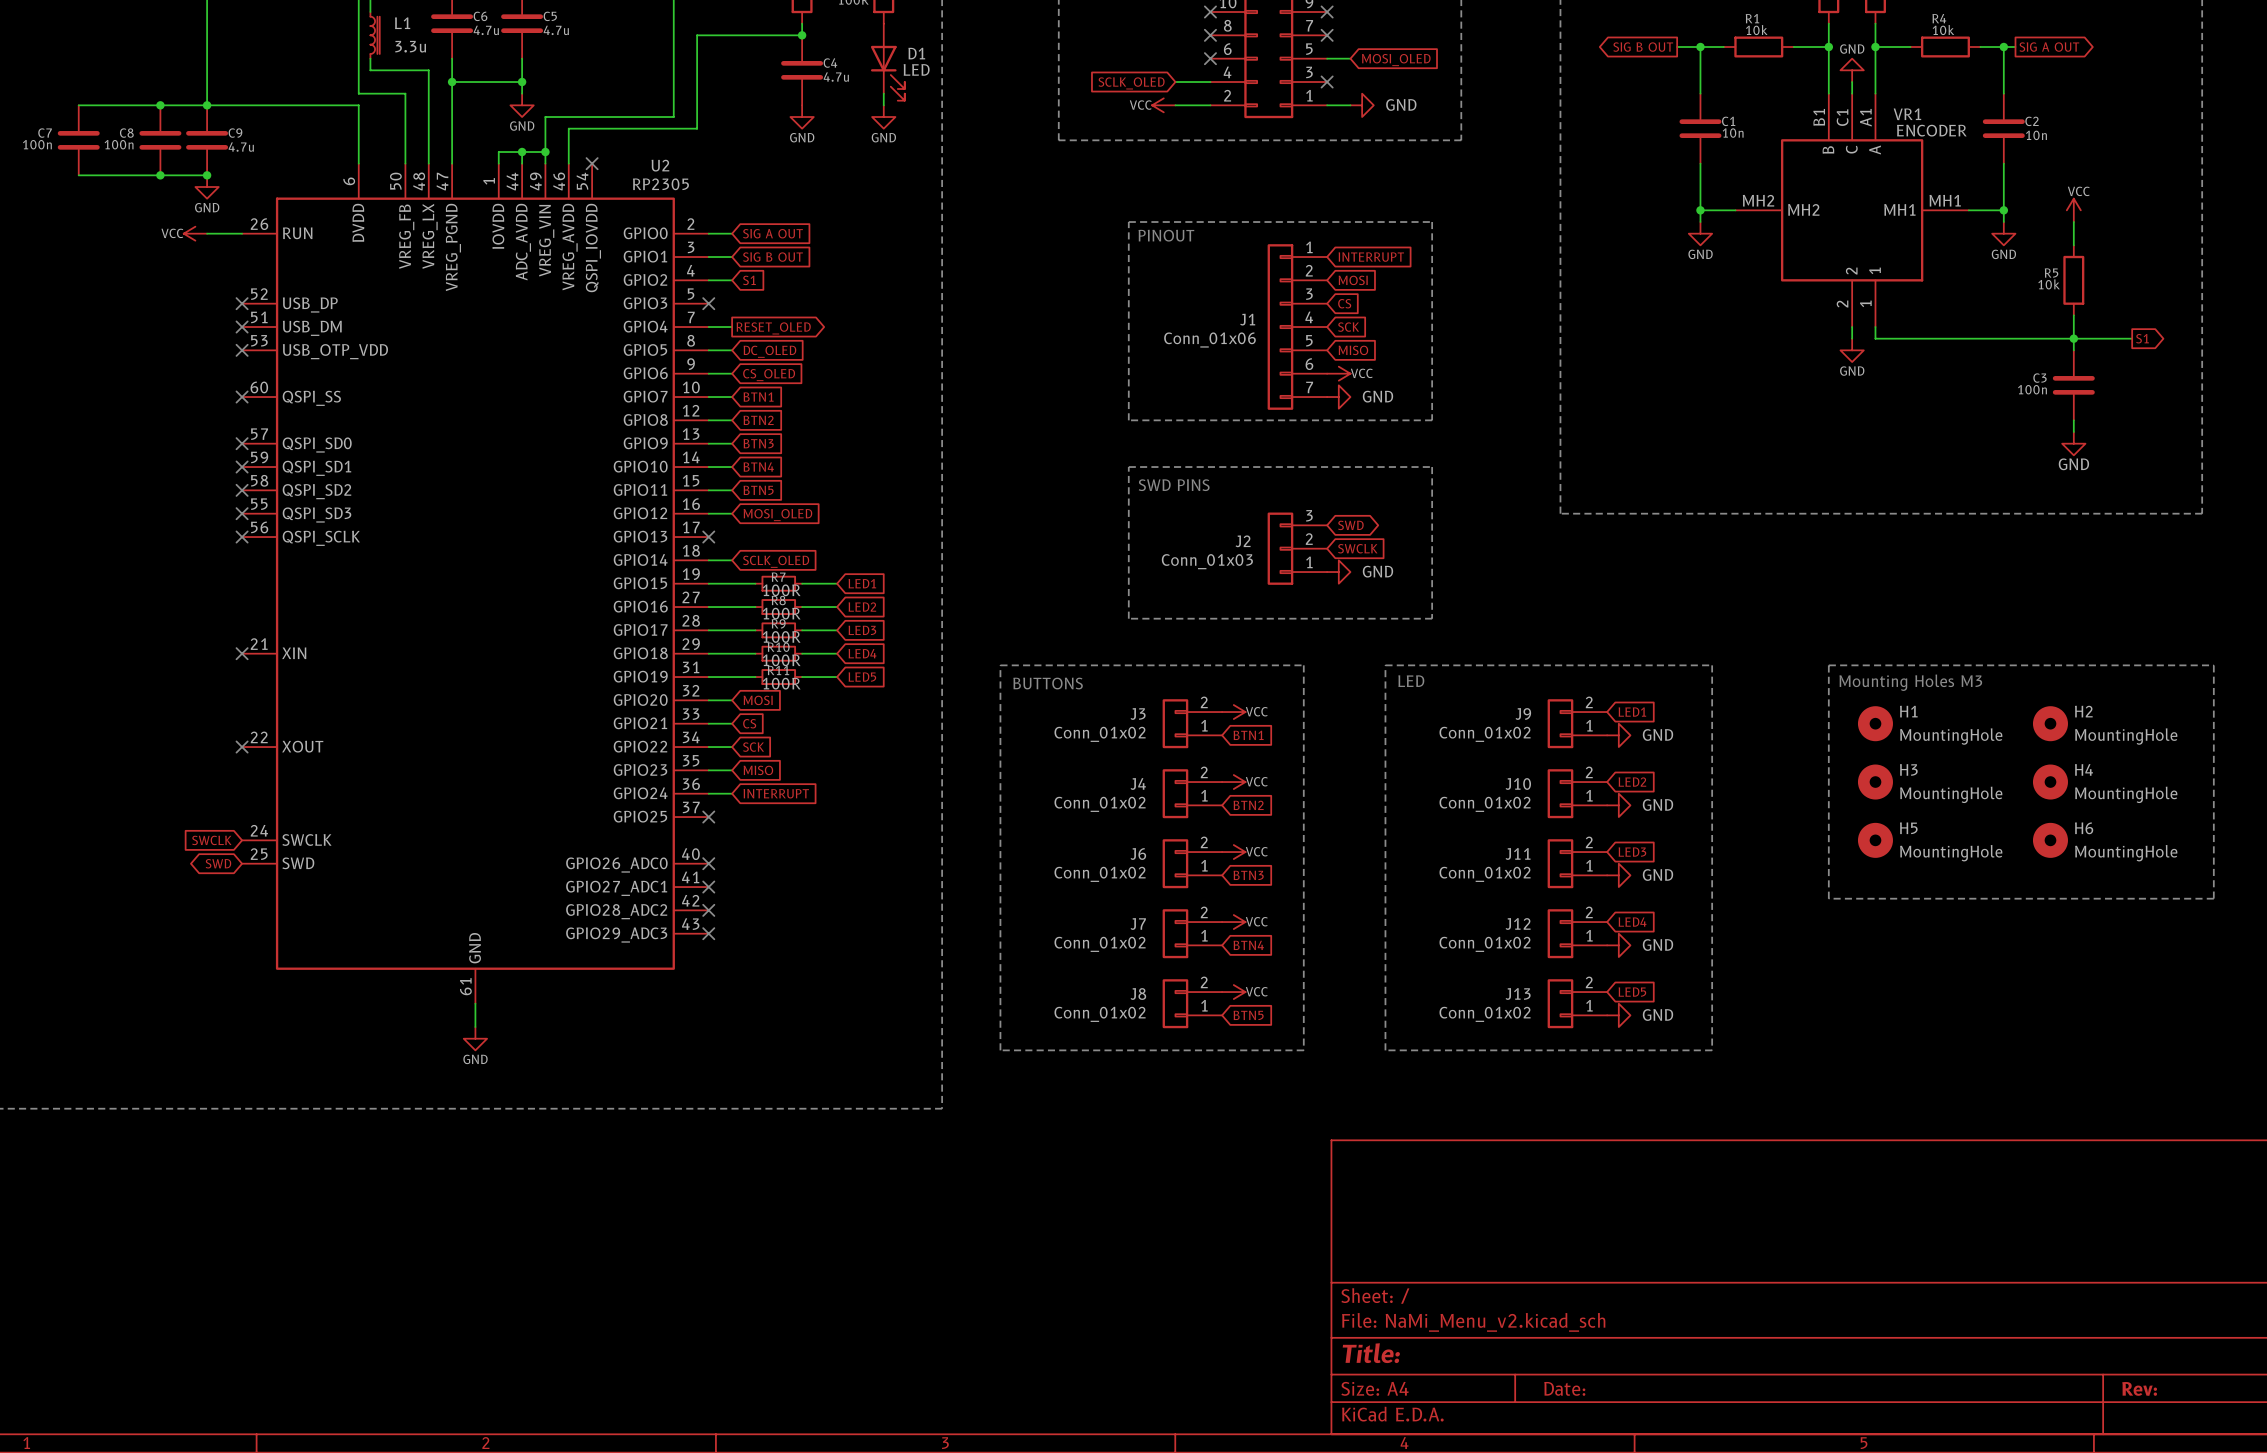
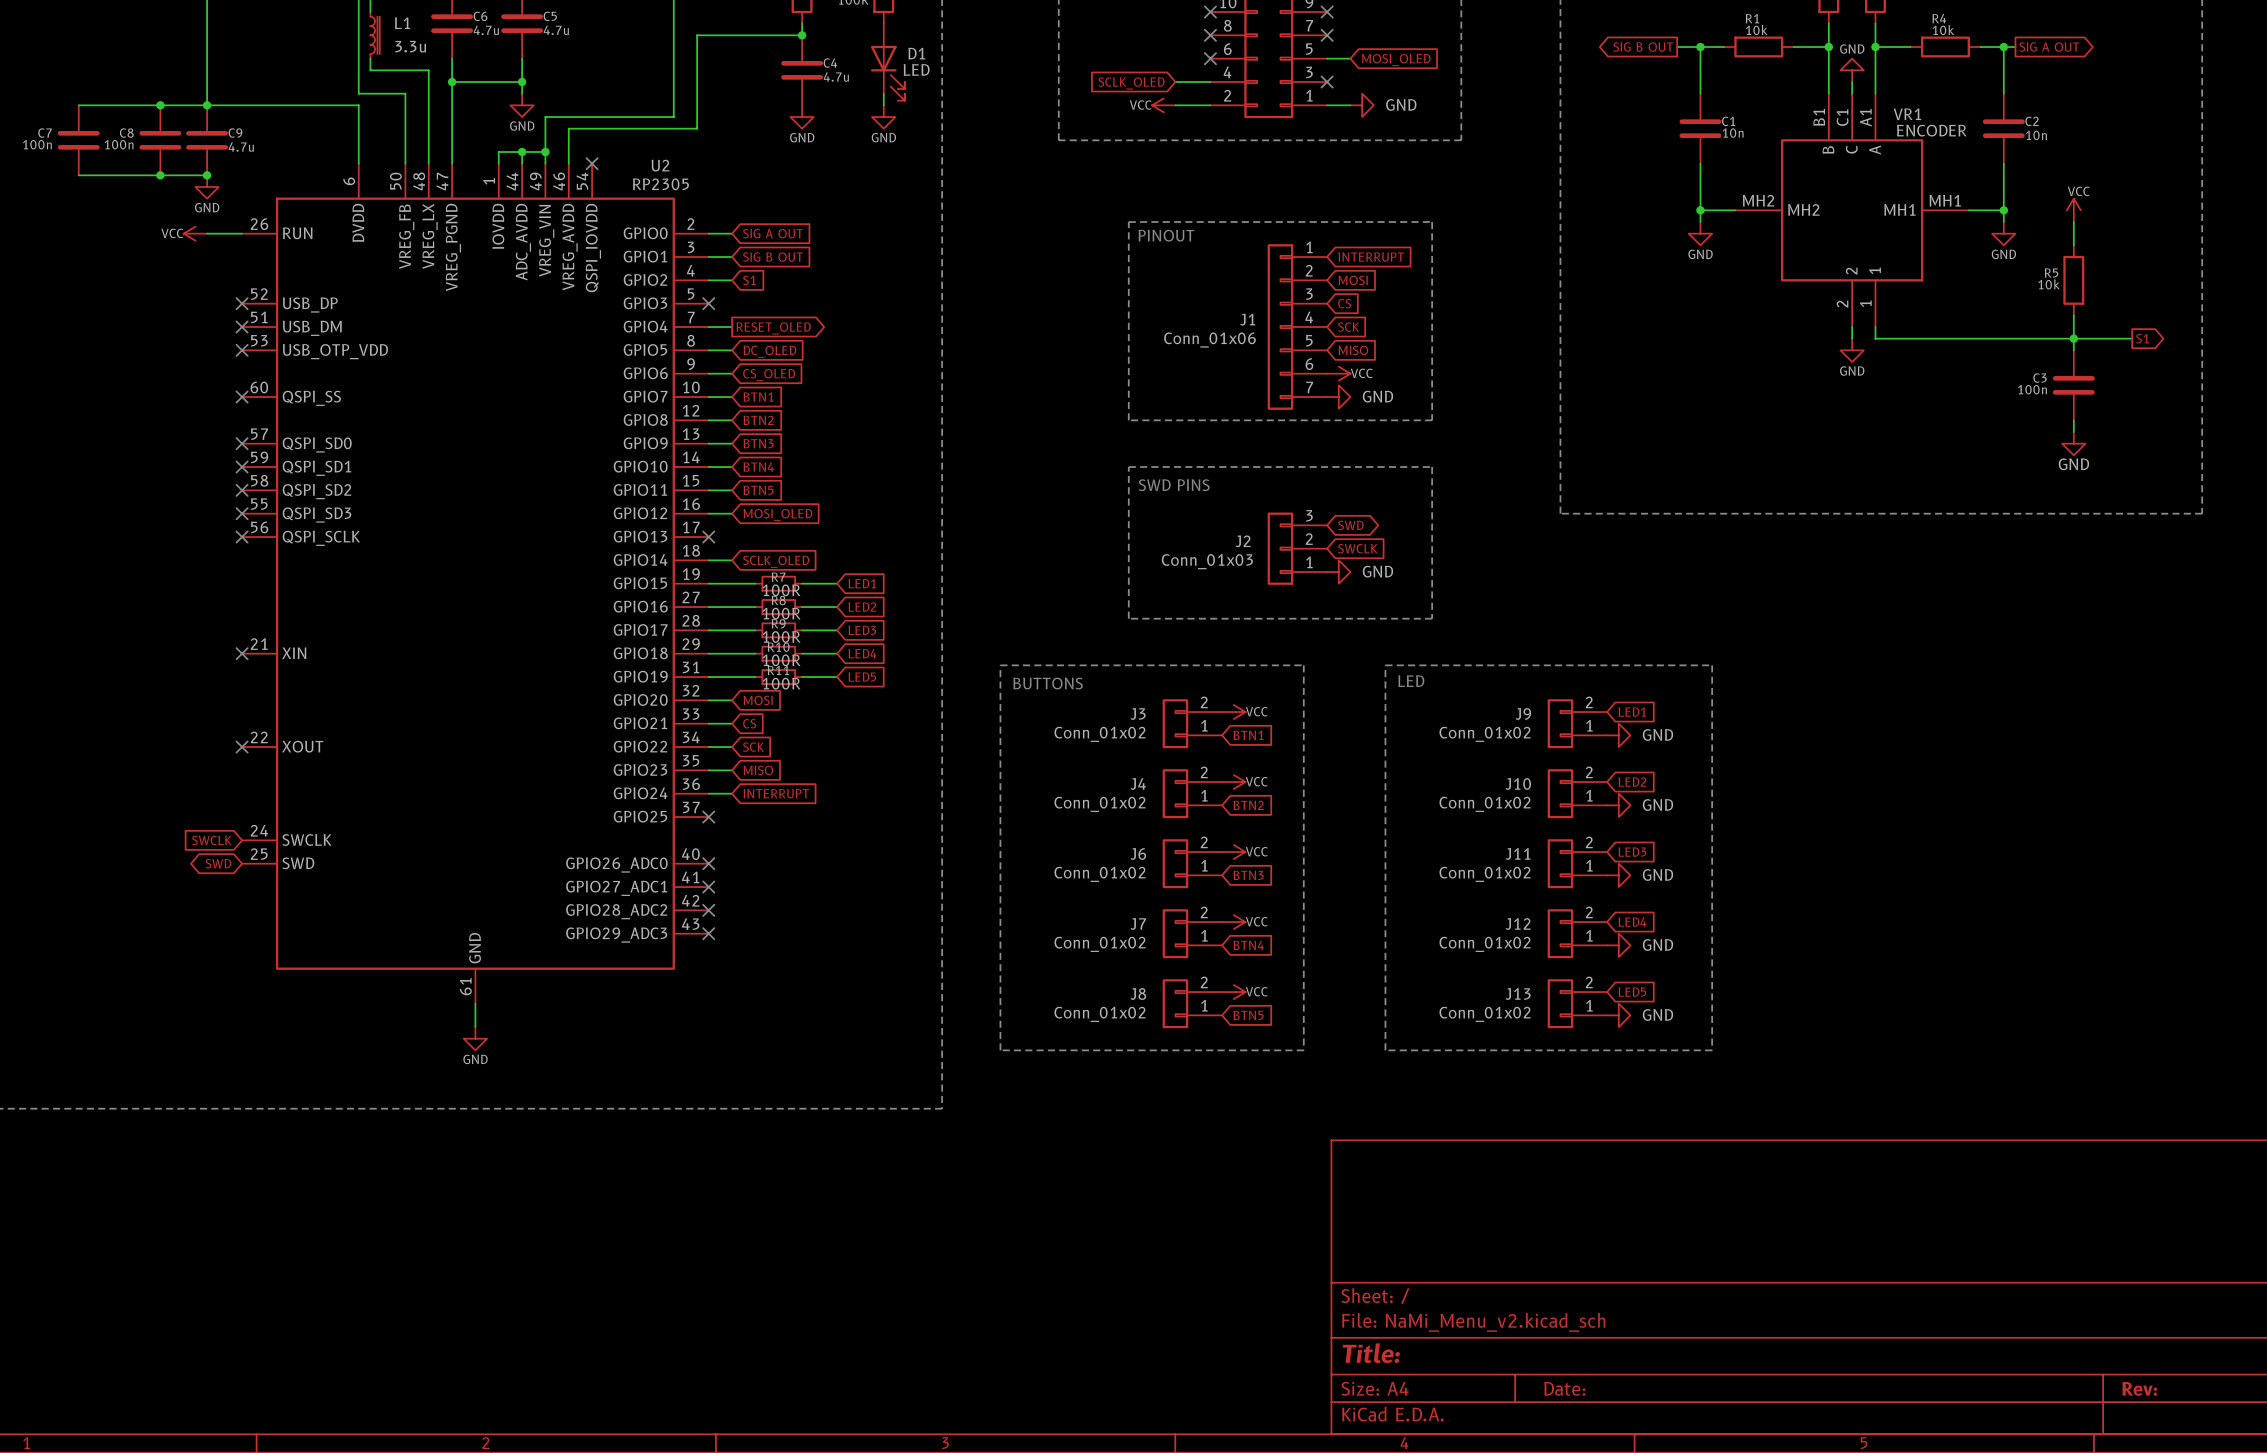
line: (1828, 665) (2213, 665) (2213, 898) (1828, 898) (1828, 665) -> none
text: Mounting Holes M3 (1910, 682) -> none
H1: MountingHole (1875, 723) -> none
H2: MountingHole (2050, 723) -> none
H3: MountingHole (1875, 782) -> none
H4: MountingHole (2050, 782) -> none
H5: MountingHole (1875, 840) -> none
H6: MountingHole (2050, 840) -> none

